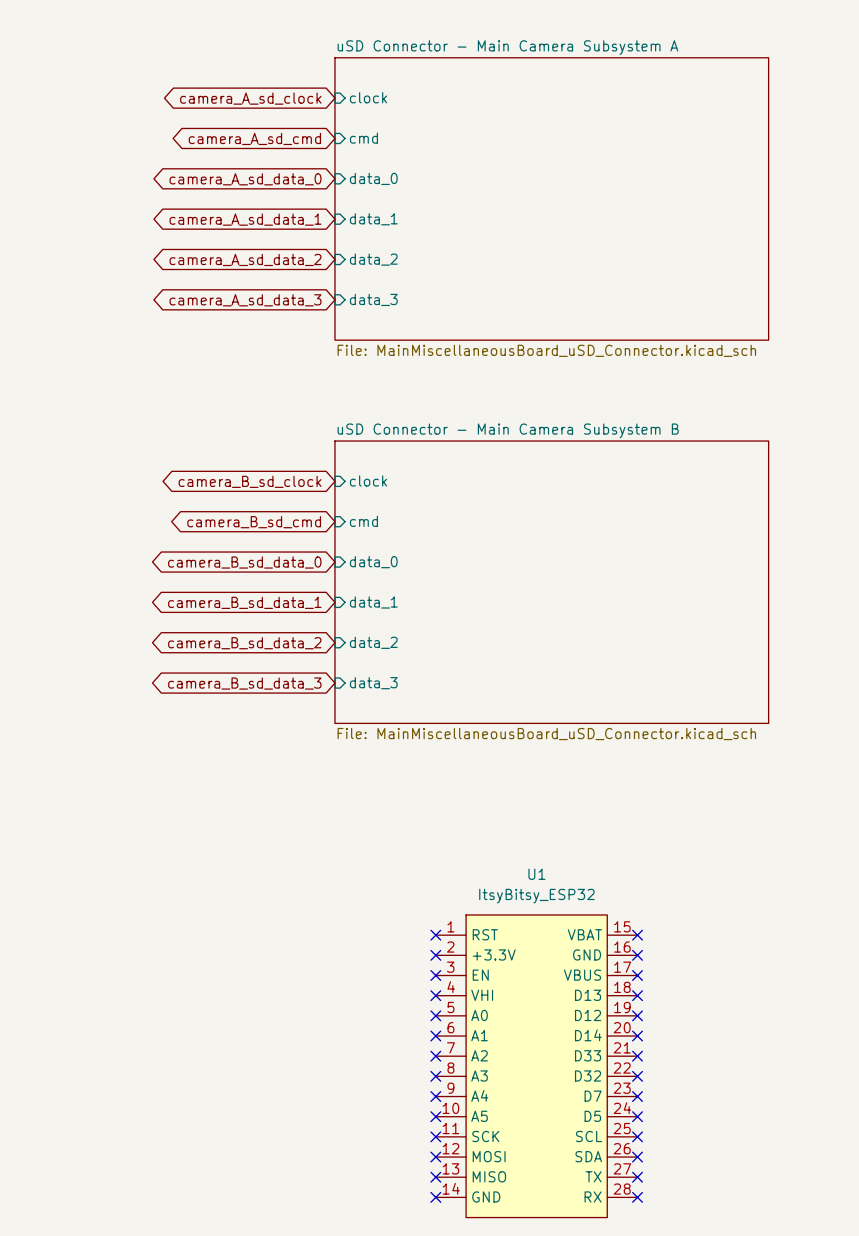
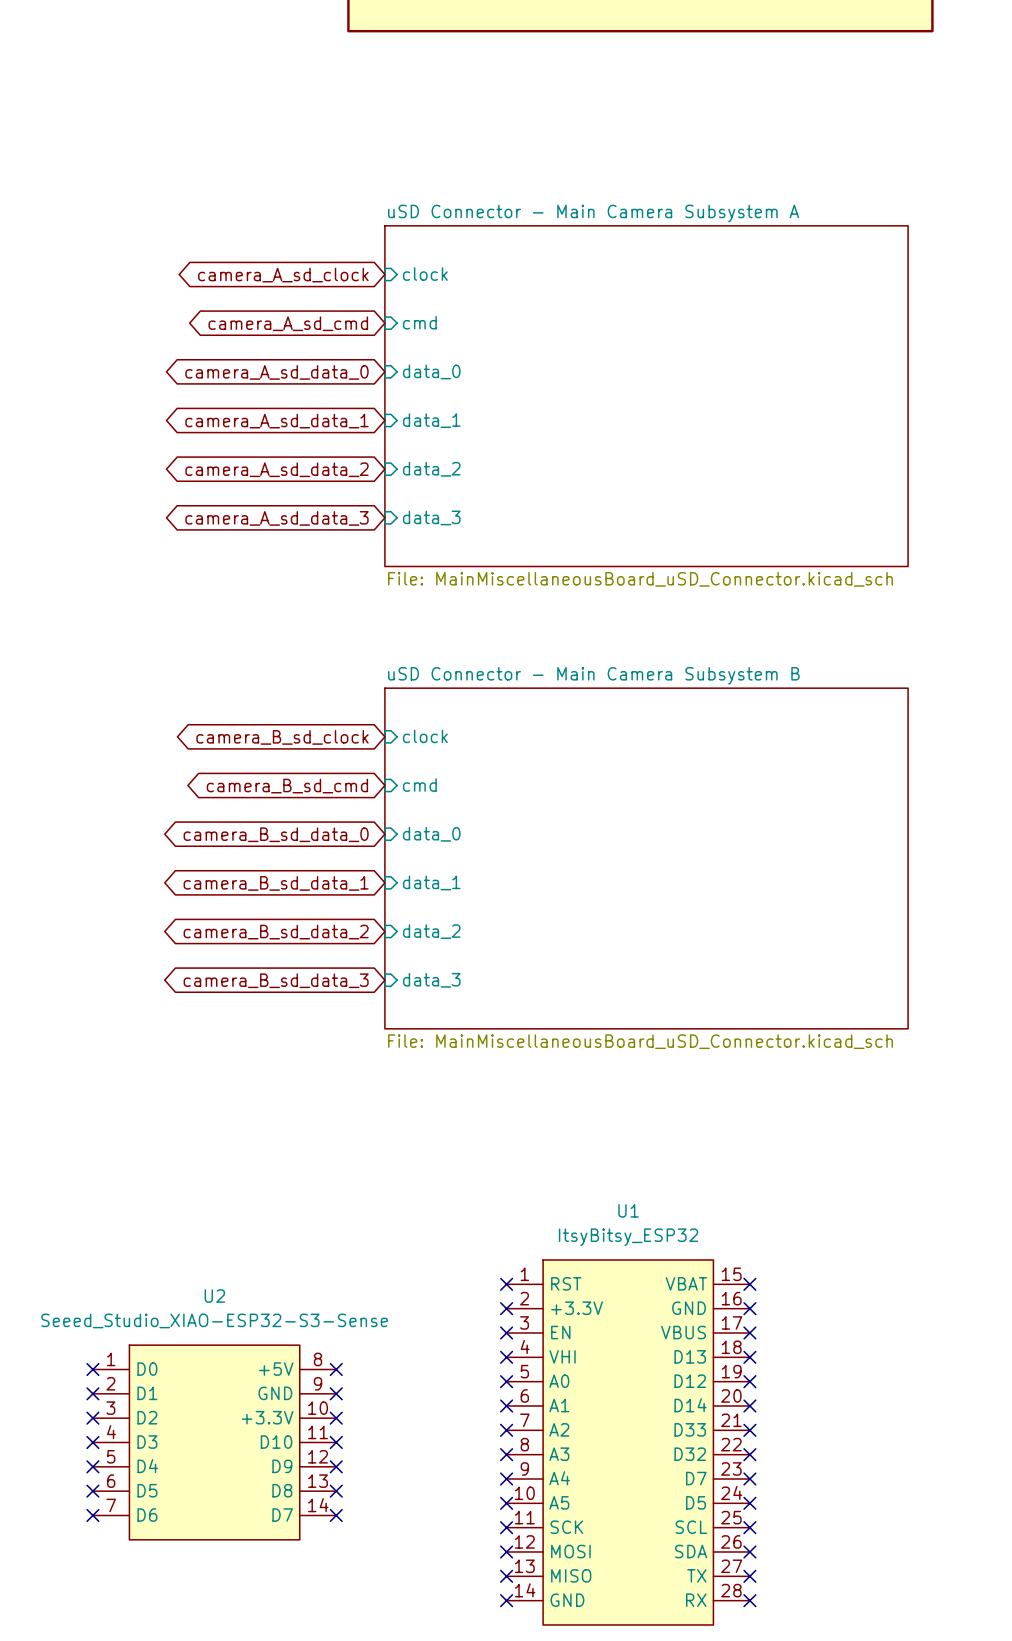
no-connect mark: none -> (92, 1369)
no-connect mark: none -> (336, 1369)
no-connect mark: none -> (92, 1393)
no-connect mark: none -> (336, 1393)
no-connect mark: none -> (92, 1418)
no-connect mark: none -> (336, 1418)
no-connect mark: none -> (92, 1442)
U2: none -> Seeed_Studio_XIAO-ESP32-S3-Sense (214, 1442)
no-connect mark: none -> (336, 1442)
no-connect mark: none -> (92, 1466)
no-connect mark: none -> (336, 1466)
no-connect mark: none -> (92, 1491)
no-connect mark: none -> (336, 1491)
no-connect mark: none -> (92, 1515)
no-connect mark: none -> (336, 1515)

